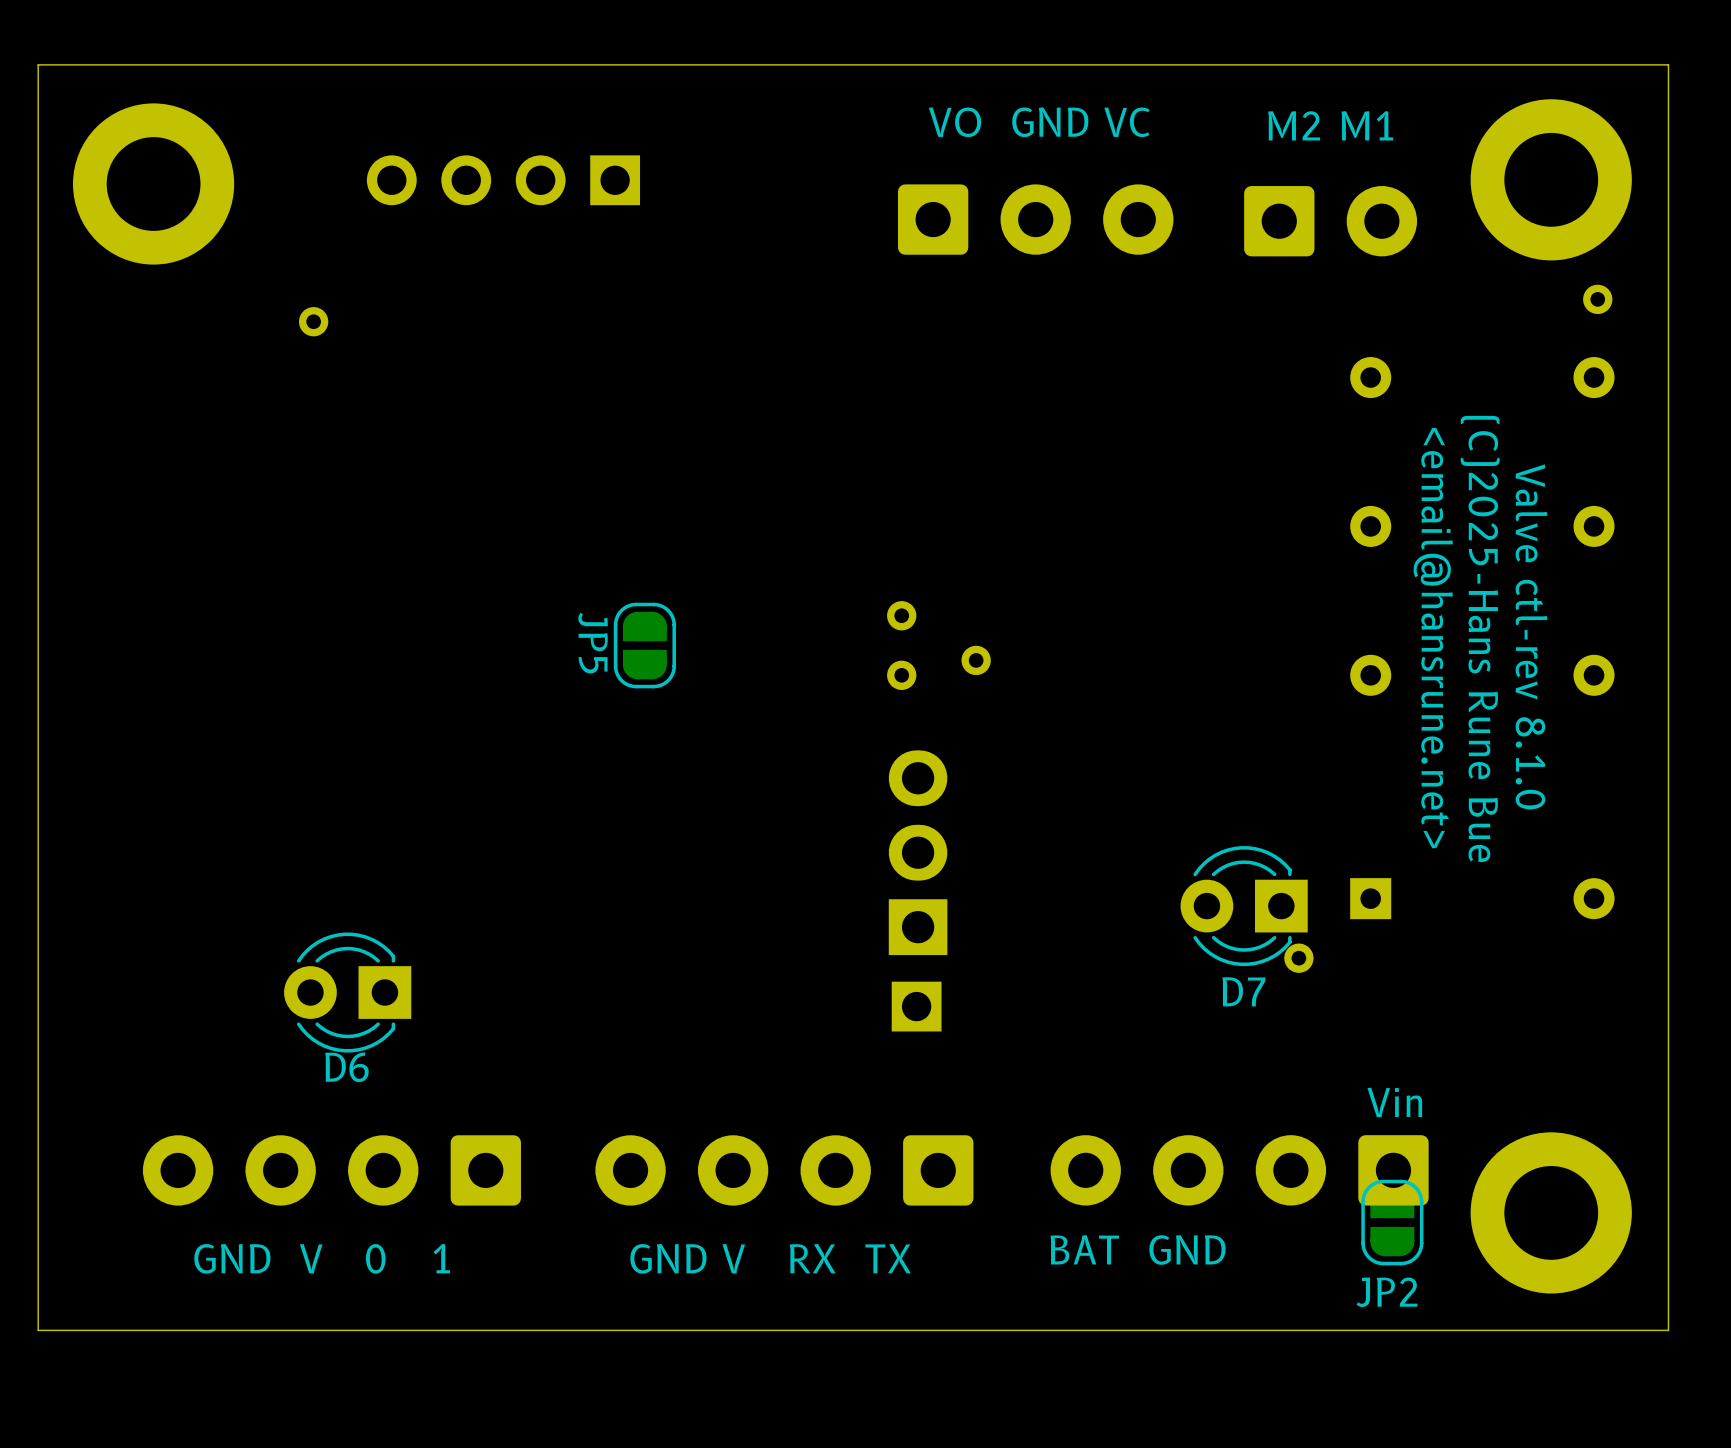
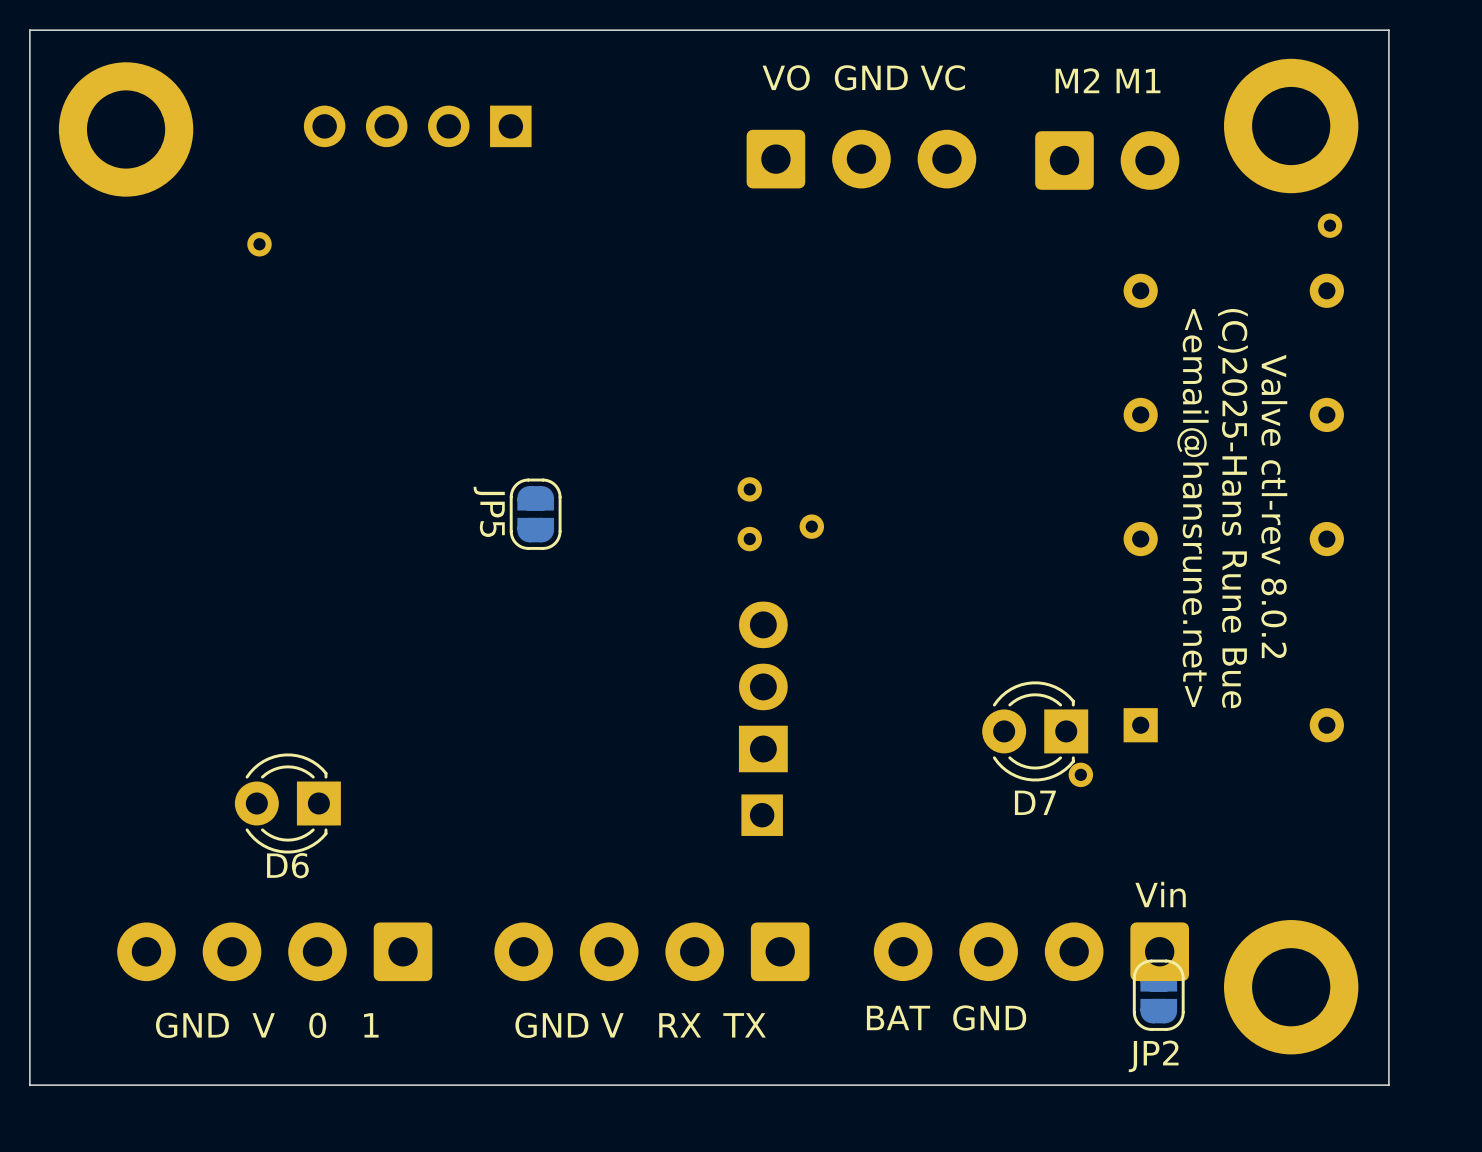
text: Valve ctl-rev 8.1.0 (1531, 636) -> Valve ctl-rev 8.0.2 (1274, 506)

